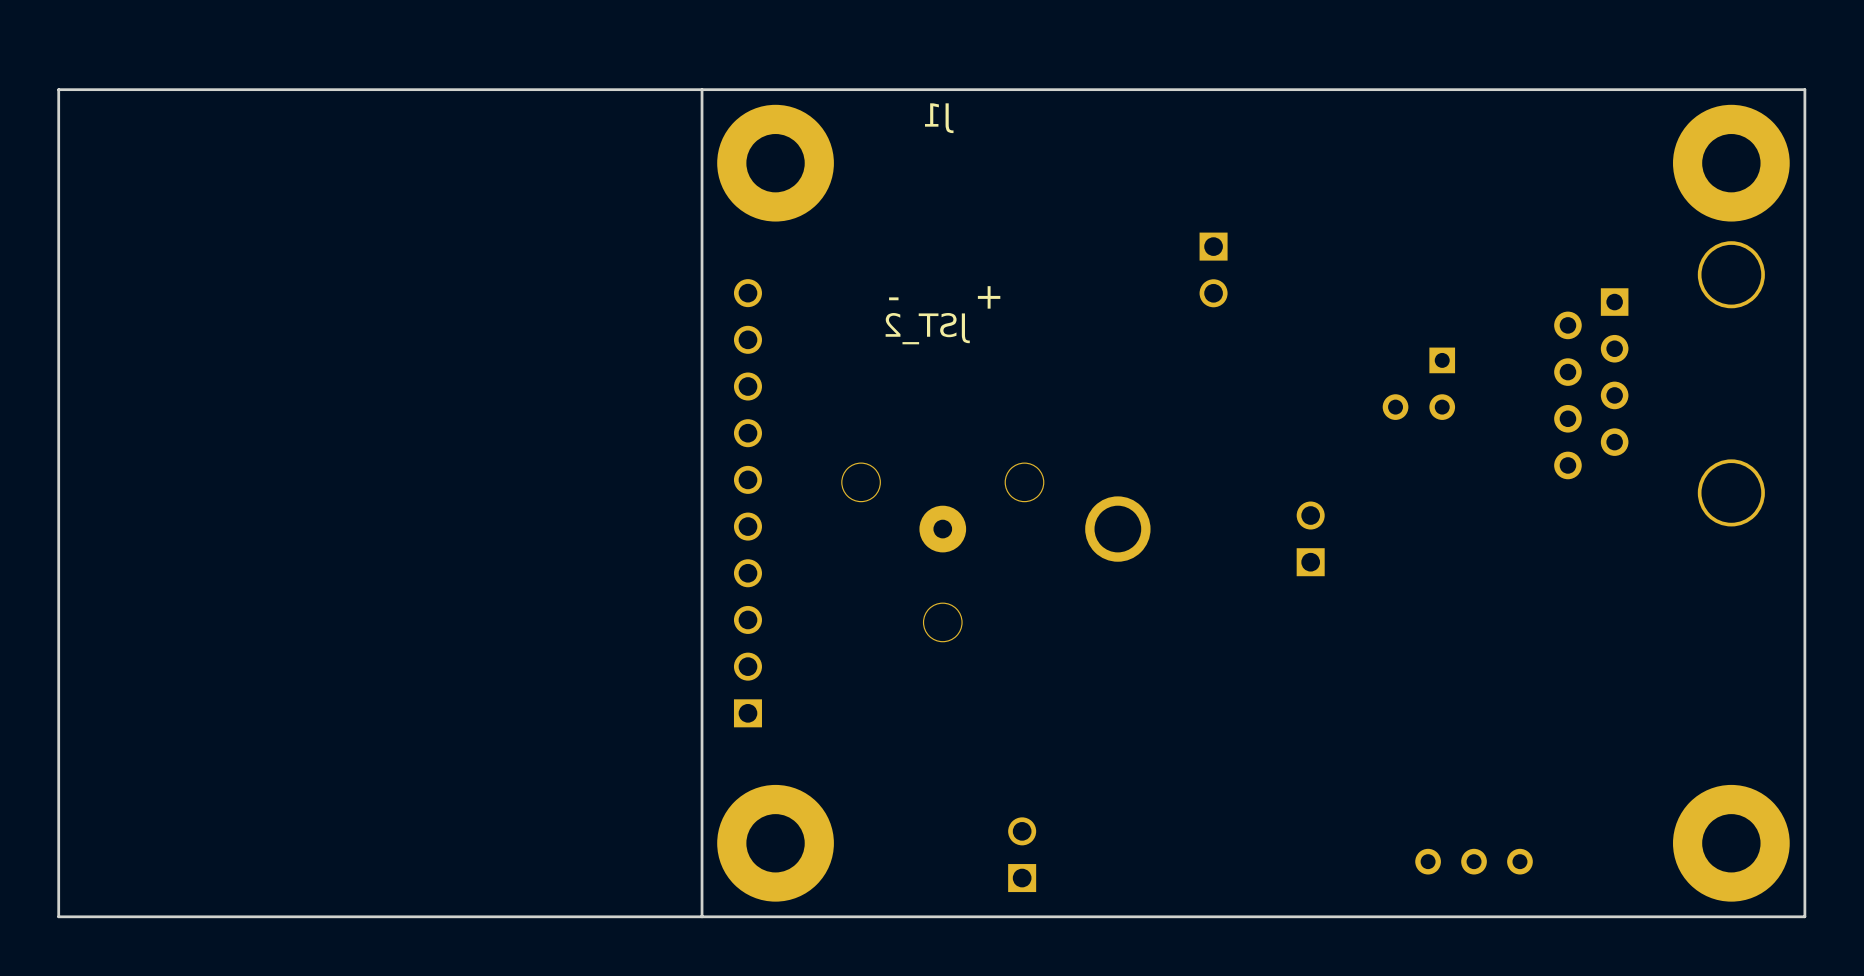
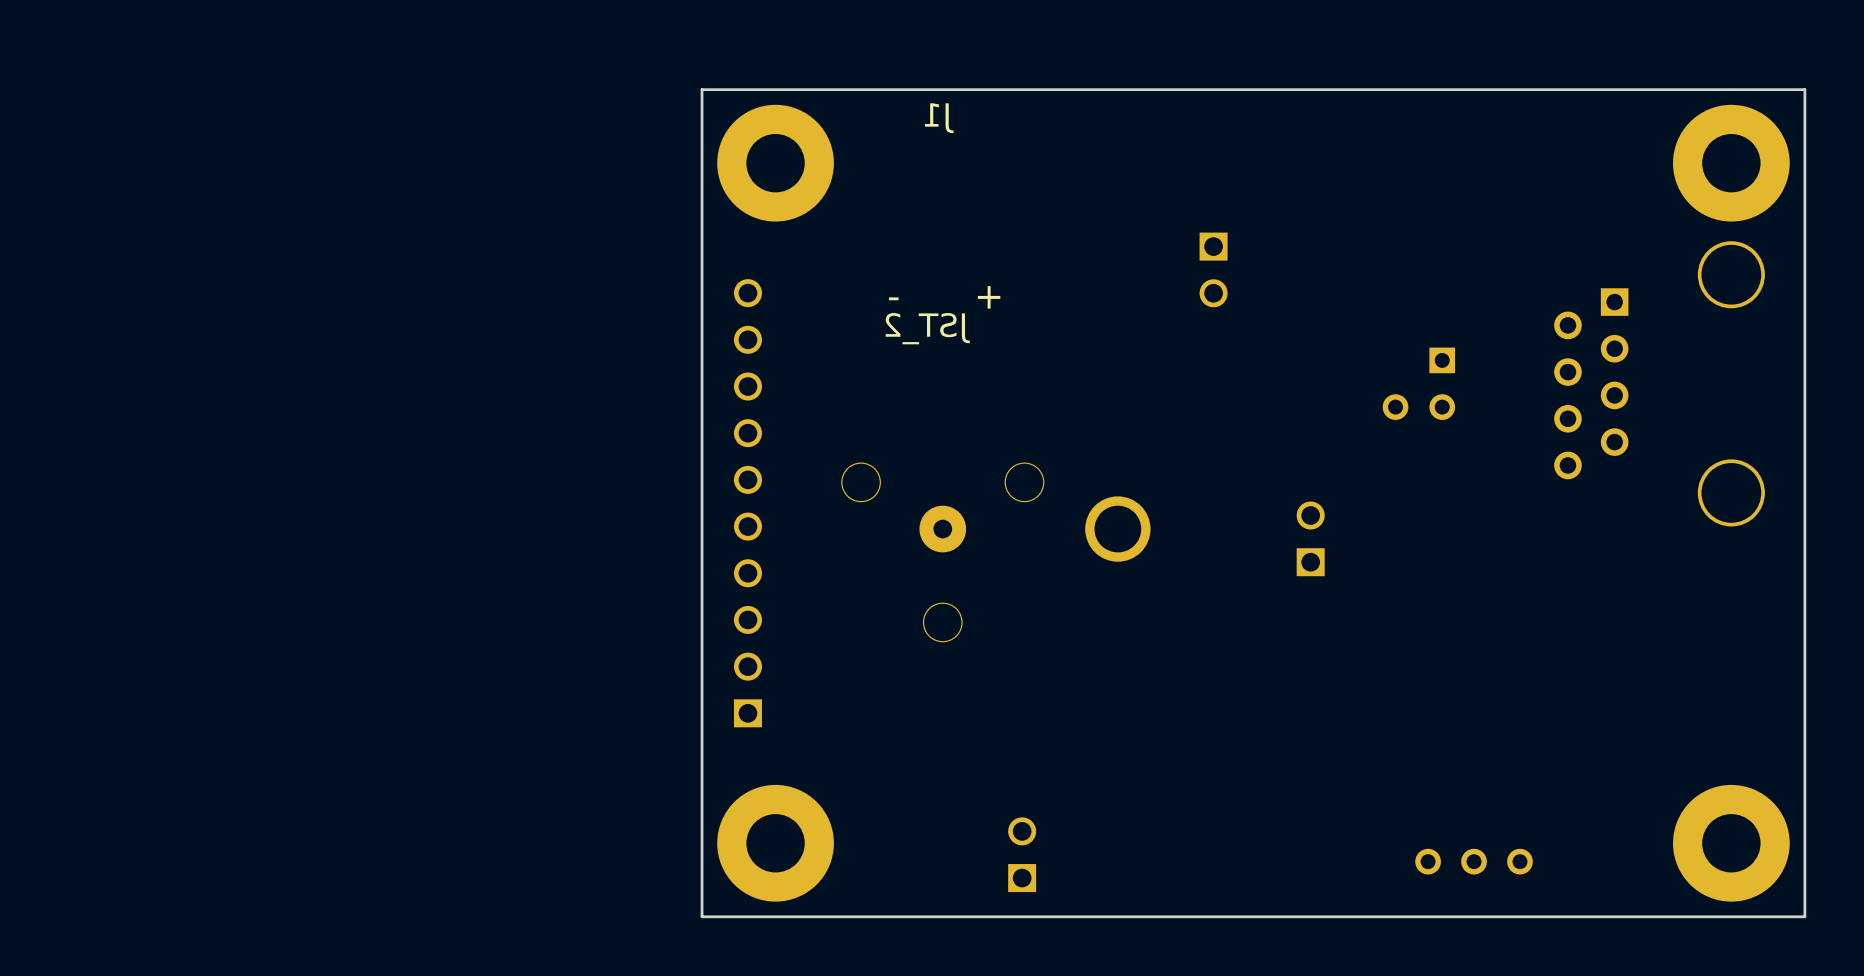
board edge: (702, 89) (58, 89) (58, 916) (702, 916) -> none

